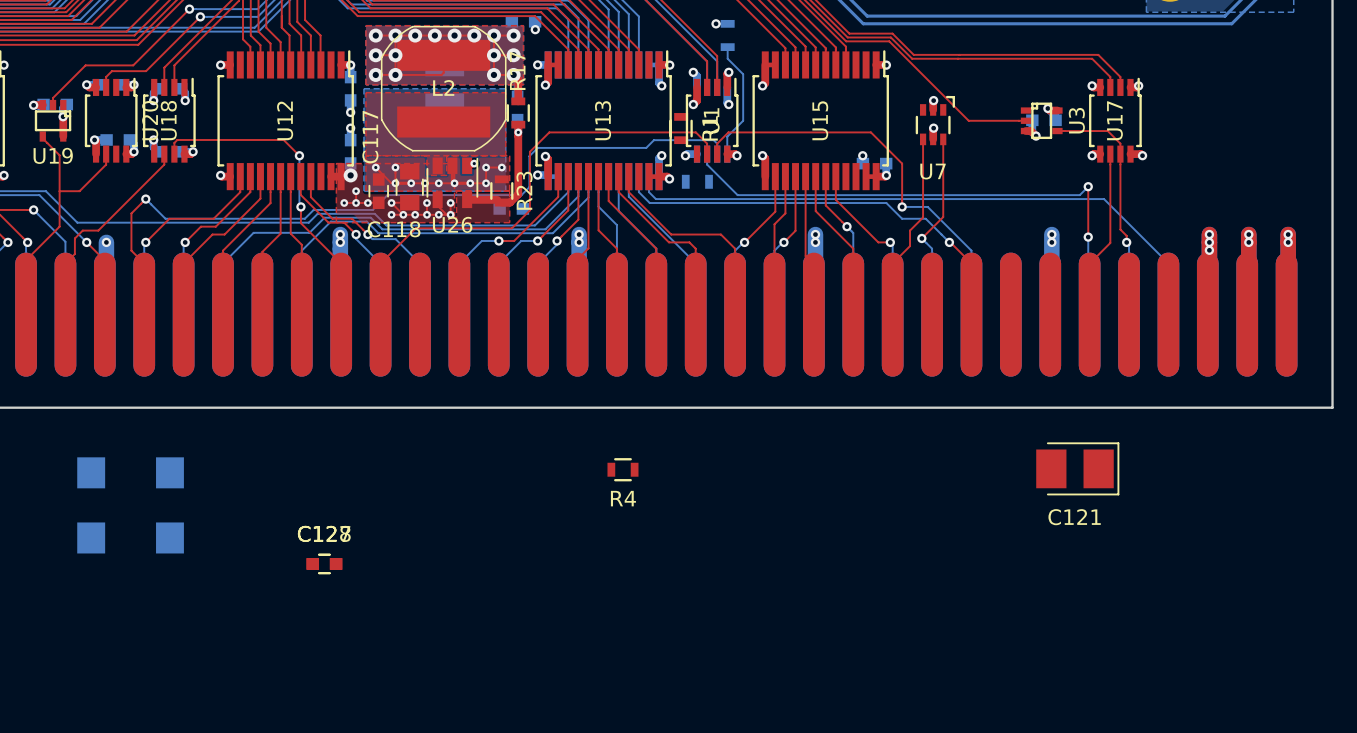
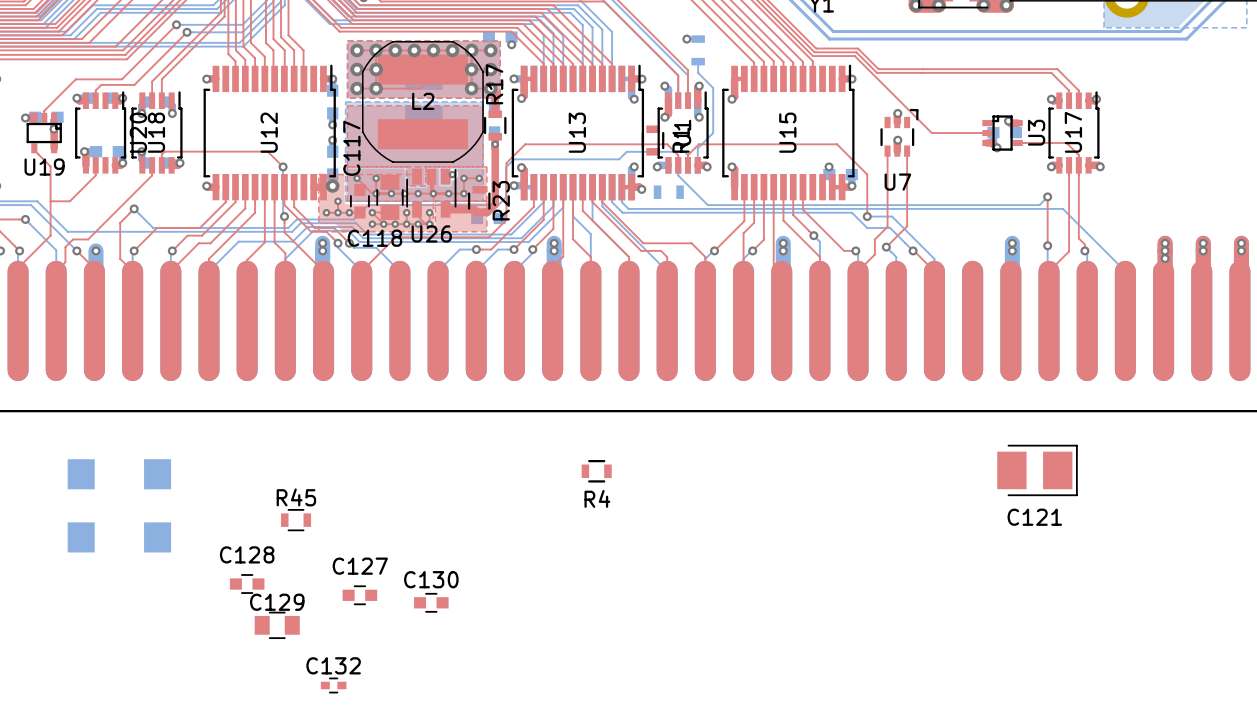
R45: none -> (296, 520)
C127 position: (324, 563) -> (359, 595)
C128 position: (324, 563) -> (247, 584)
C130: none -> (431, 602)
C129: none -> (277, 625)
C132: none -> (333, 685)

